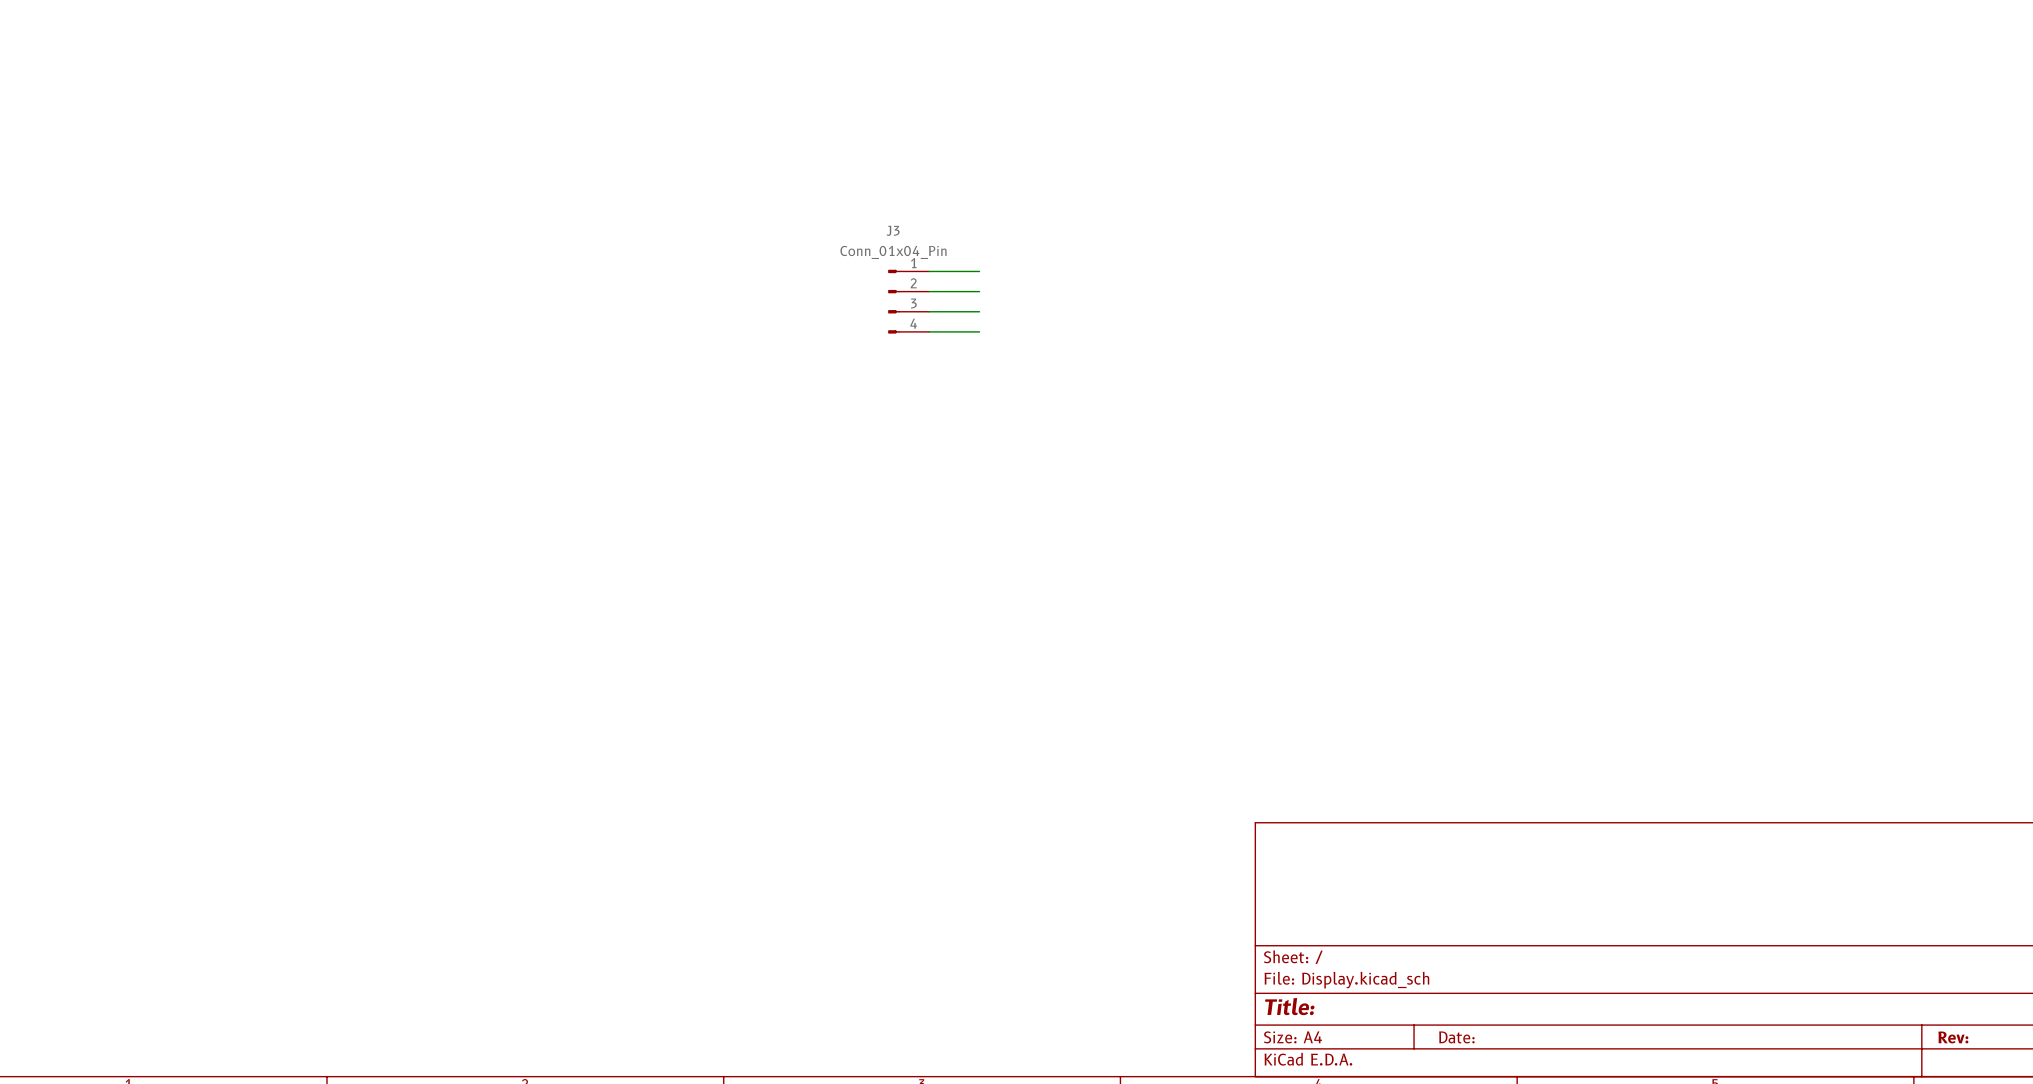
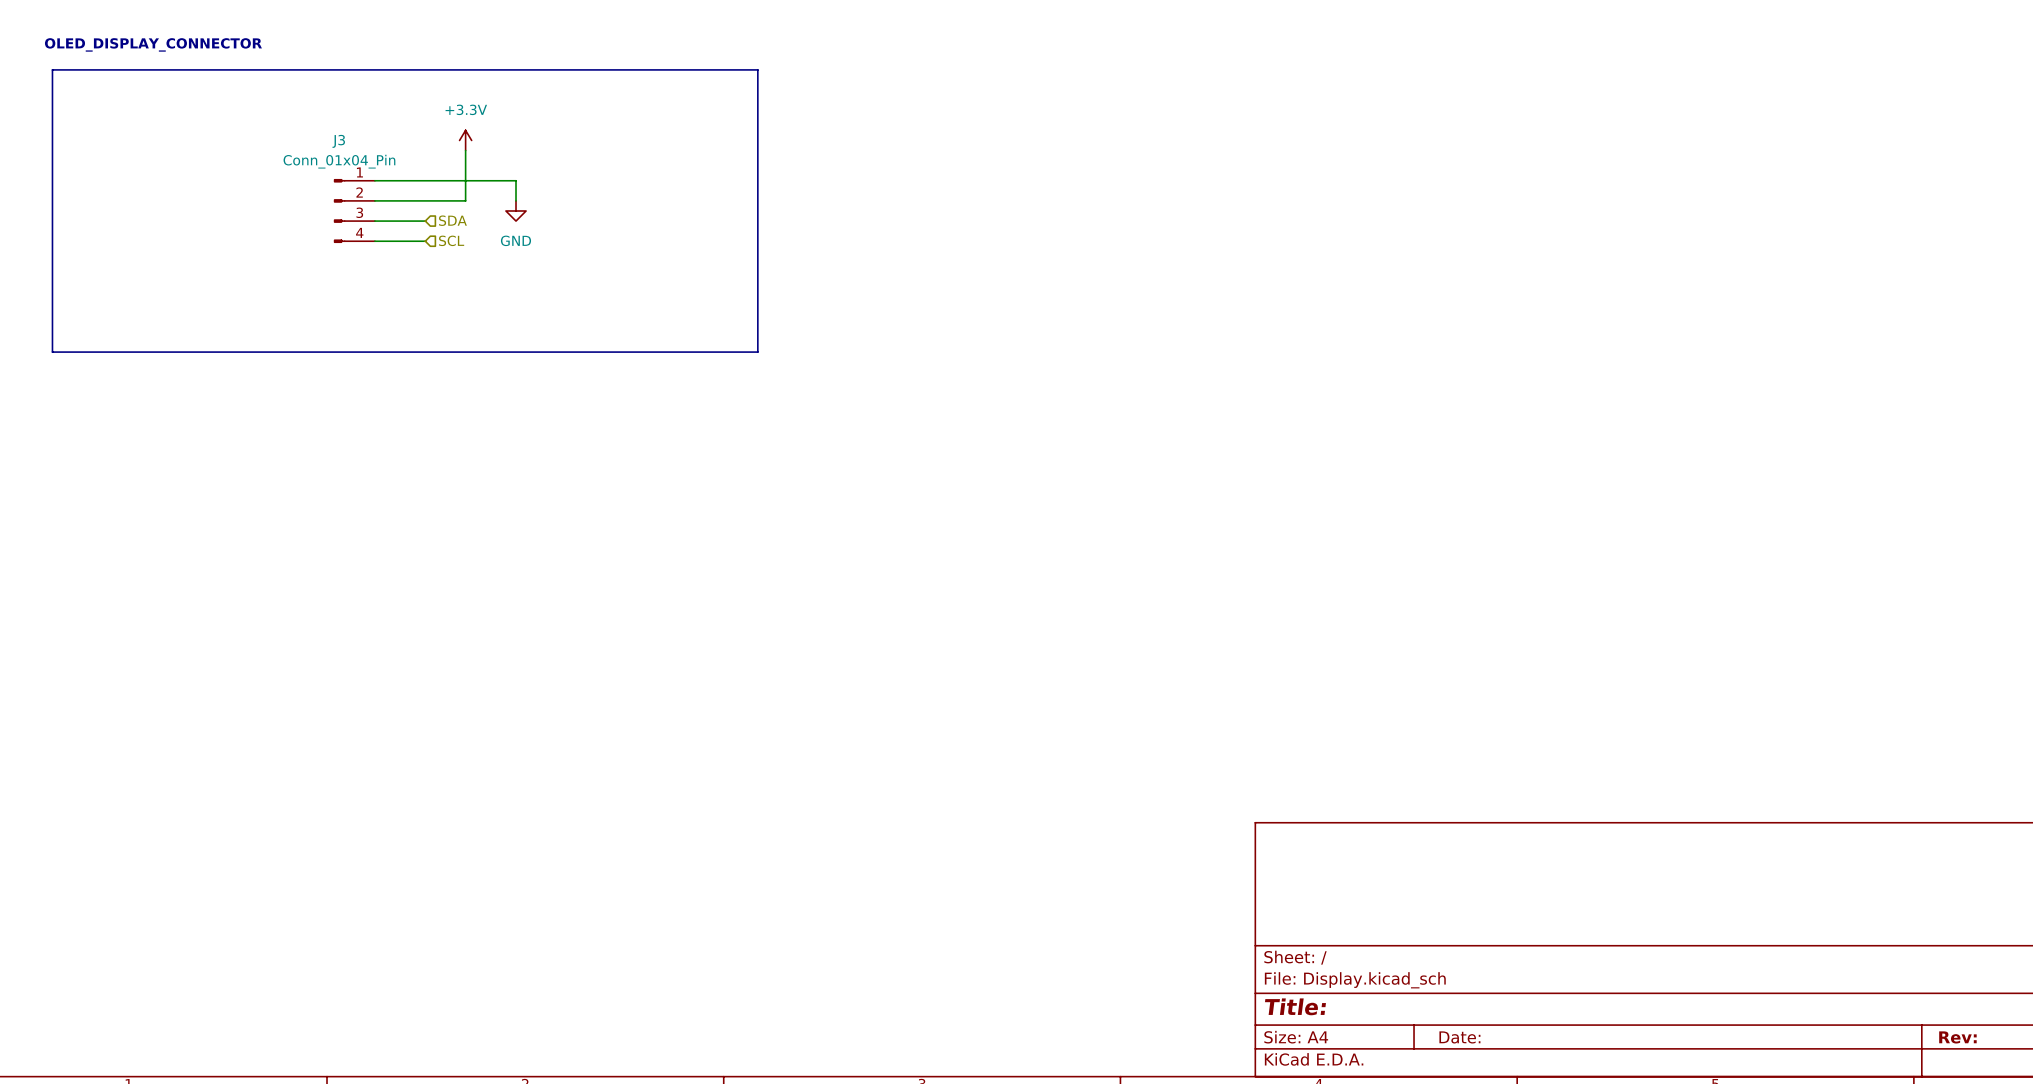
text: none -> OLED_DISPLAY_CONNECTOR (153, 44)
line: none -> (52, 69) (757, 69) (757, 352) (52, 352) (52, 69)
power symbol: none -> +3.3V (465, 140)
wire: none -> (465, 150) (465, 200) (374, 200)
wire: none -> (374, 180) (516, 180) (516, 200)
power symbol: none -> GND (516, 211)
hierarchical label: none -> SDA (452, 220)
wire: none -> (374, 221) (425, 221)
hierarchical label: none -> SCL (451, 240)
wire: none -> (374, 241) (425, 241)
wire: (929, 271) (979, 271) -> none
wire: (929, 291) (979, 291) -> none
J3 position: (908, 301) -> (354, 211)
wire: (929, 311) (979, 311) -> none
wire: (929, 331) (979, 331) -> none

